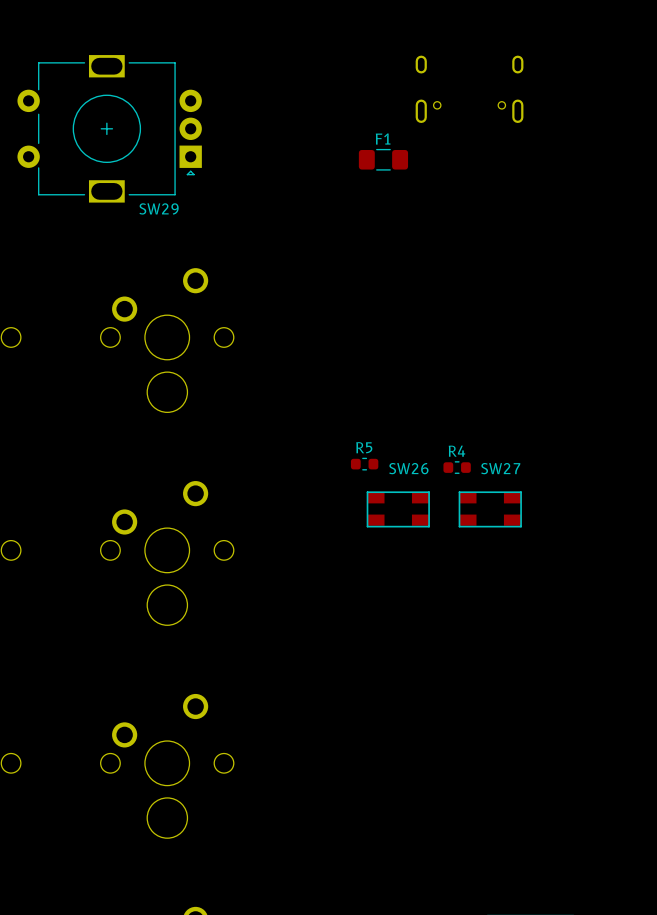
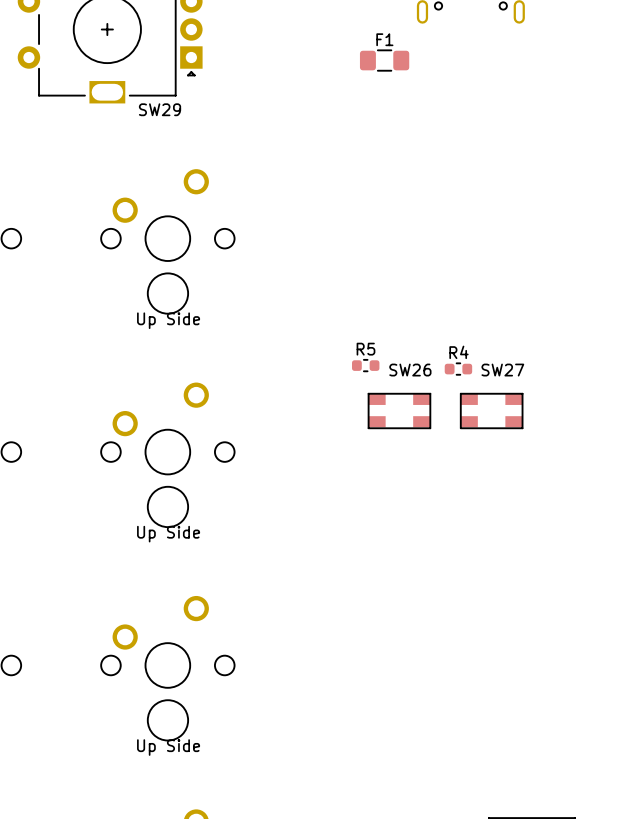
part: none -> (168, 320)
part: none -> (168, 534)
part: none -> (168, 747)

